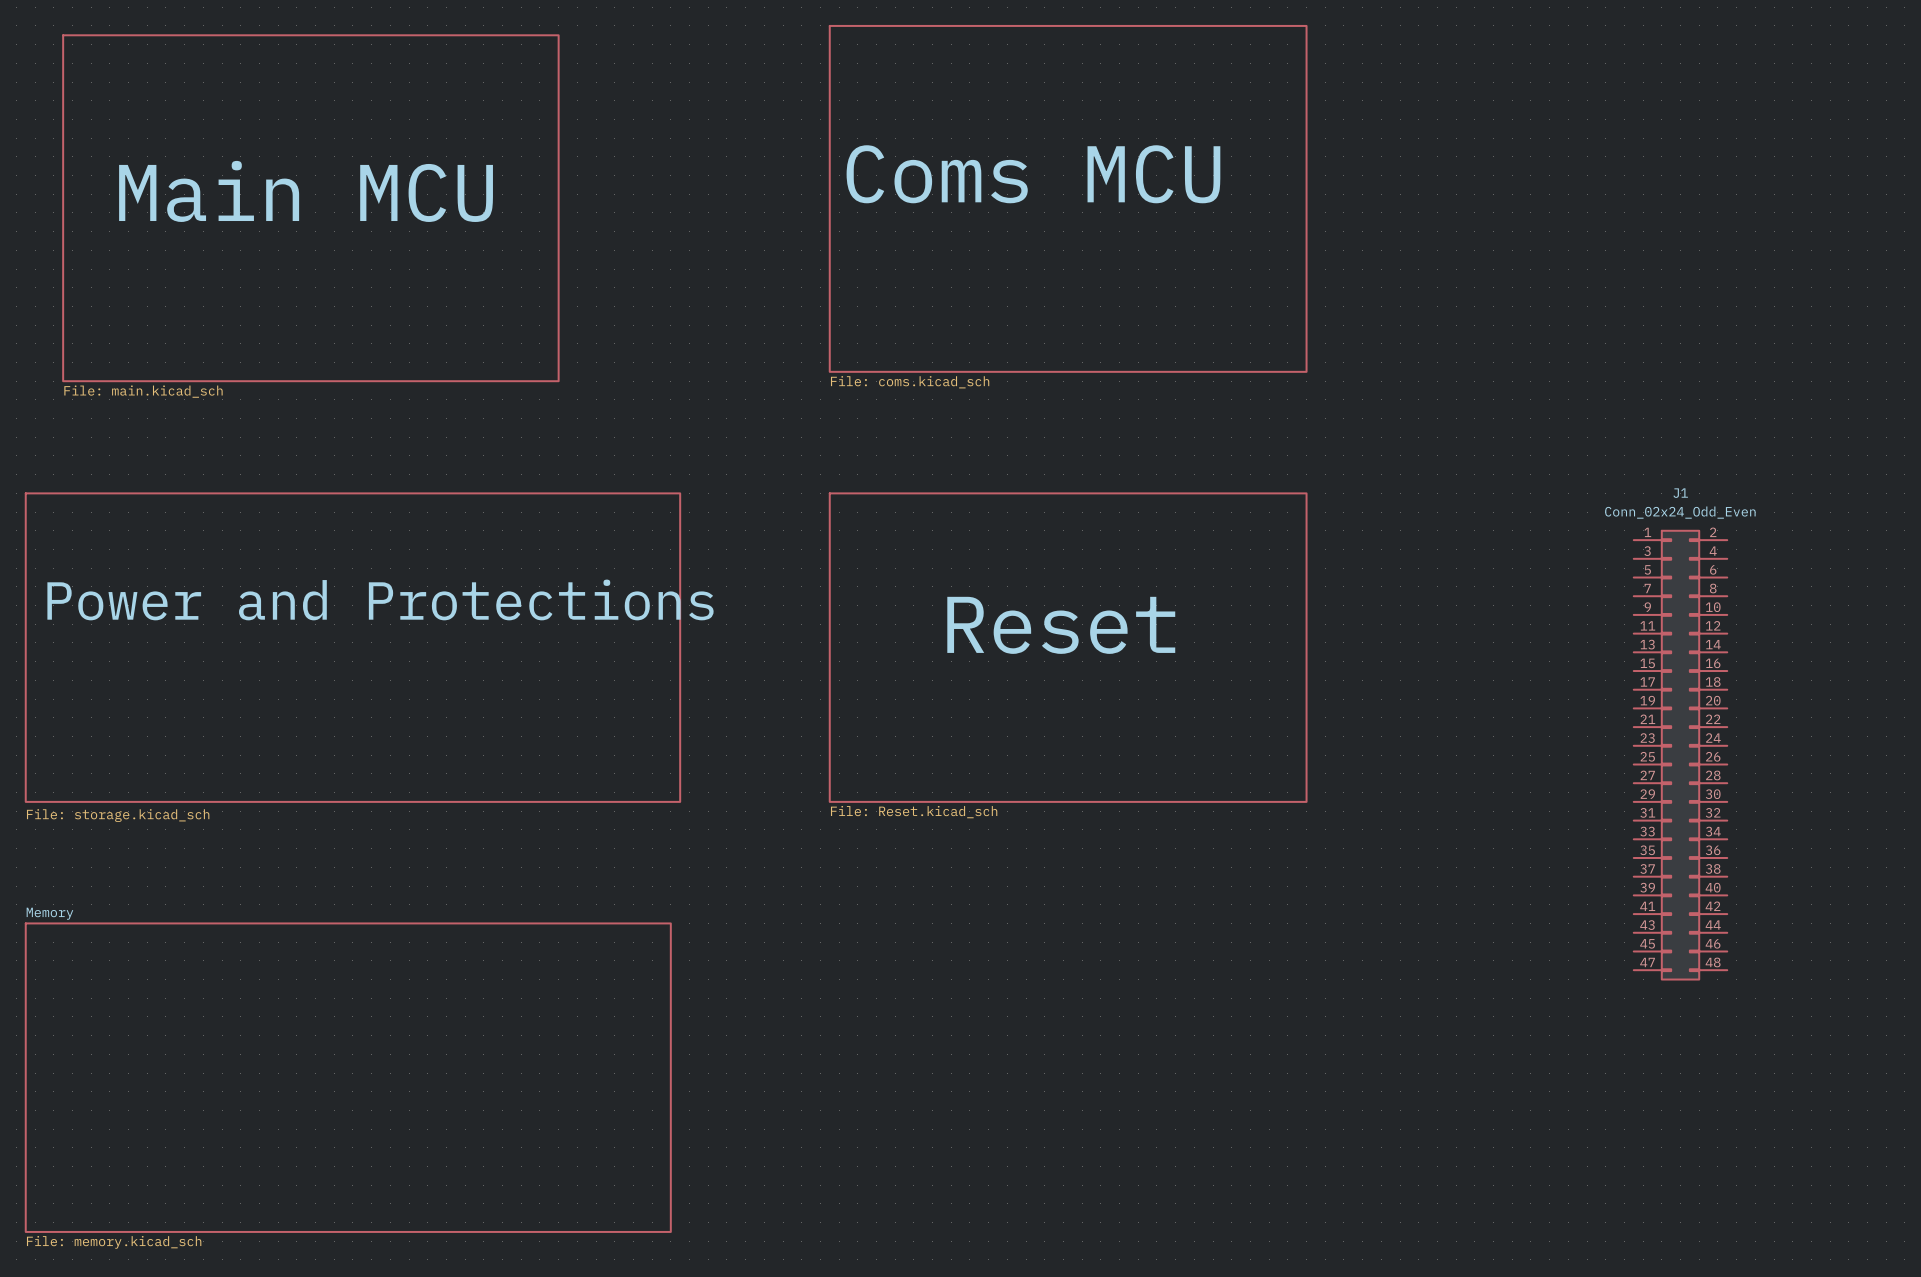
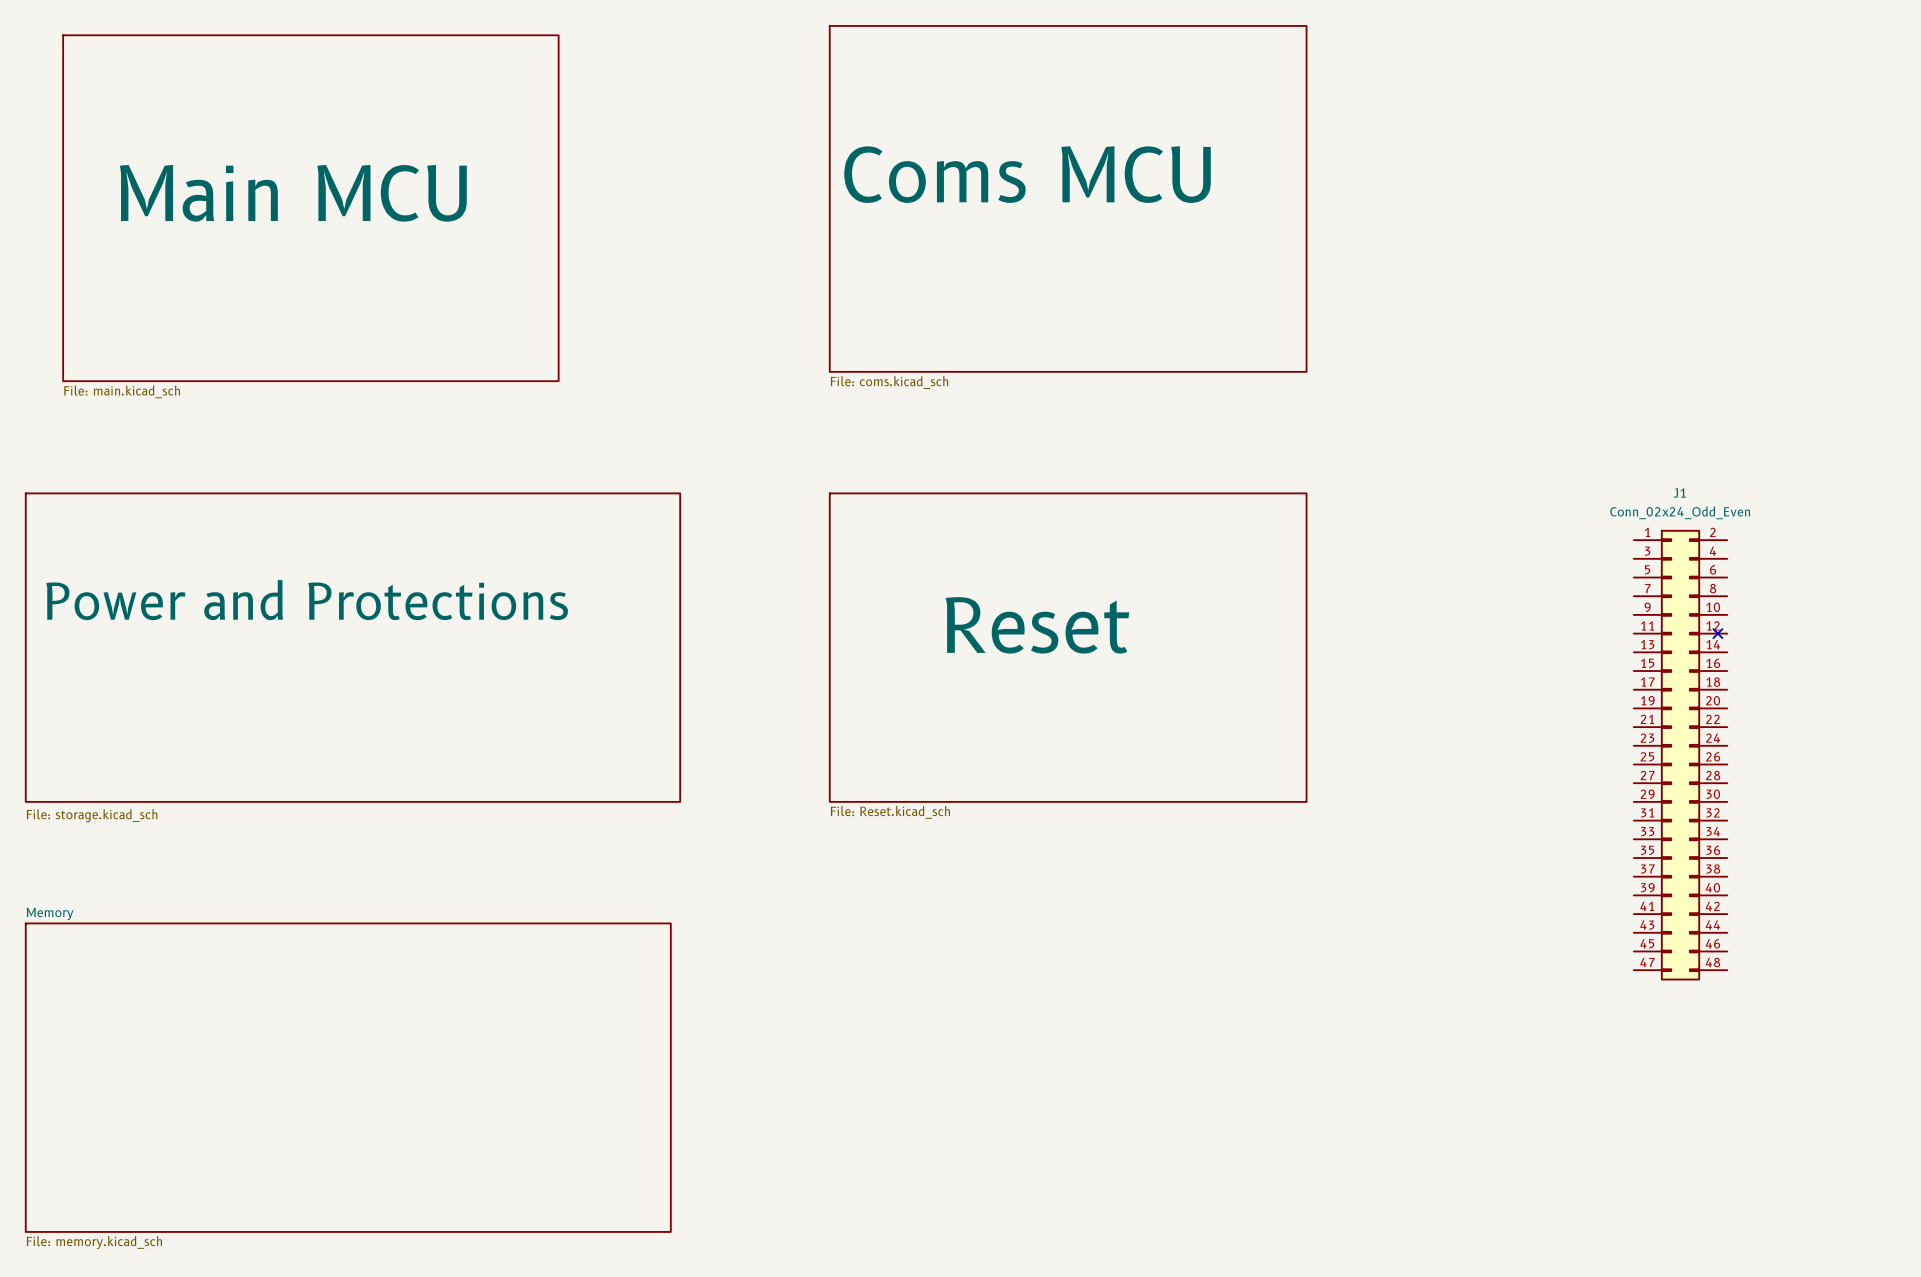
no-connect mark: none -> (1717, 633)

